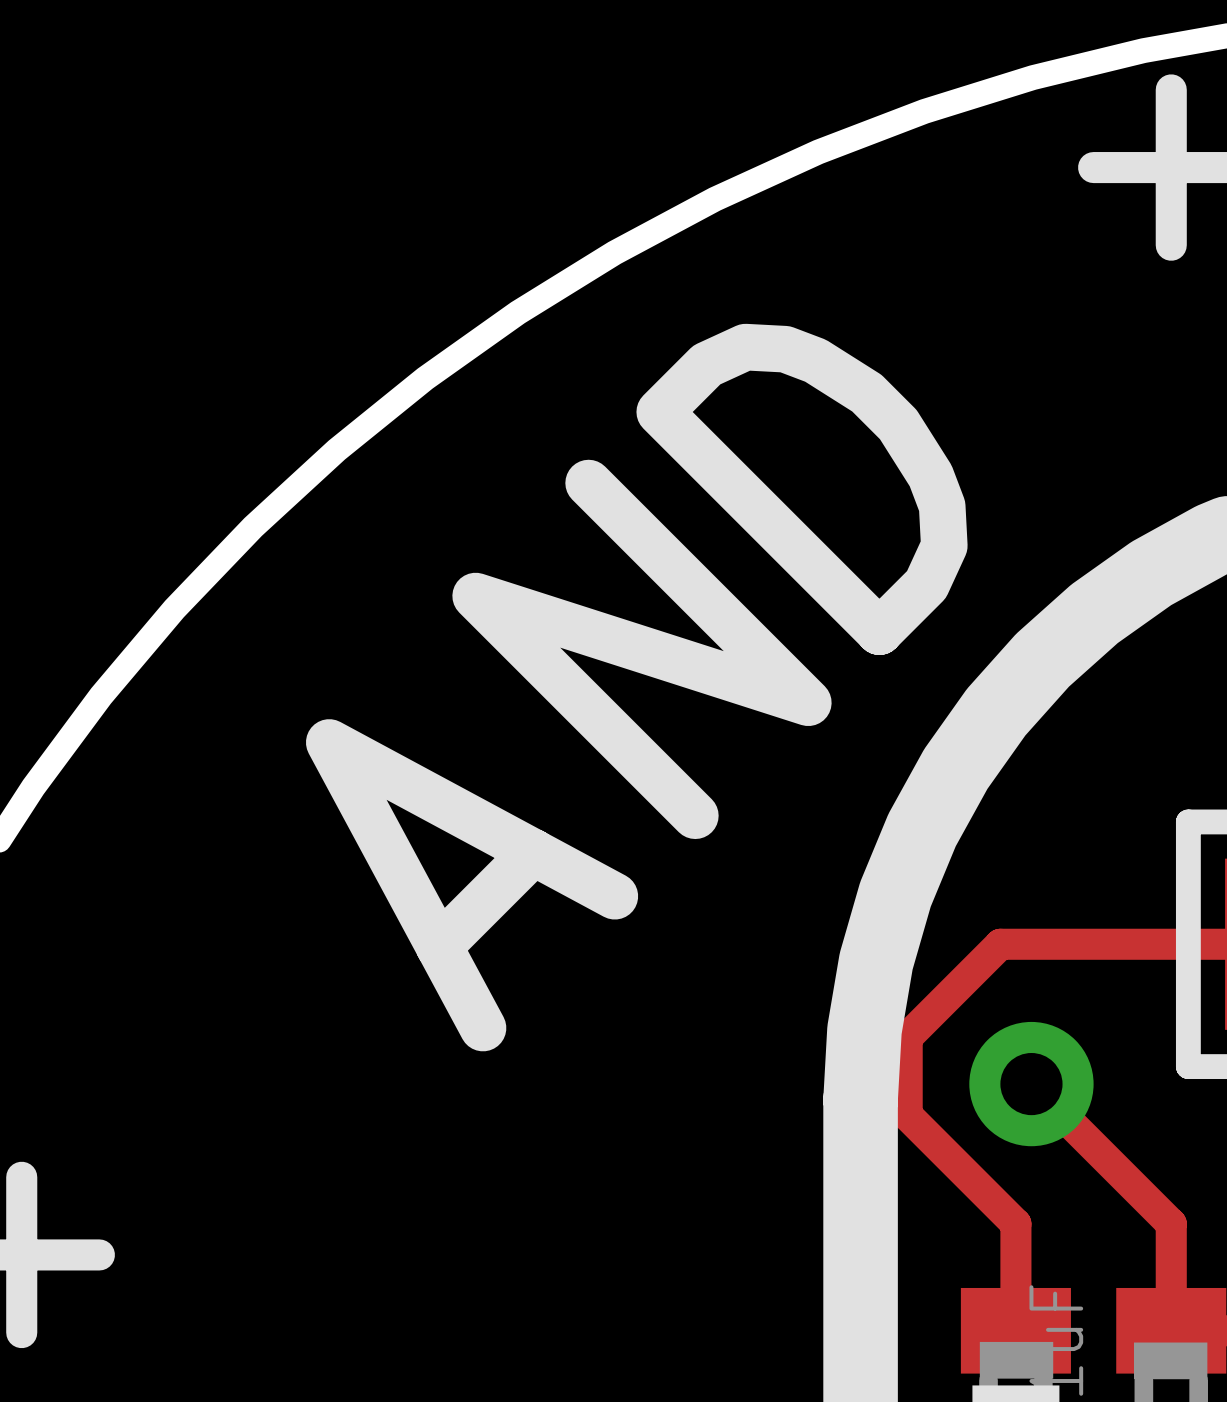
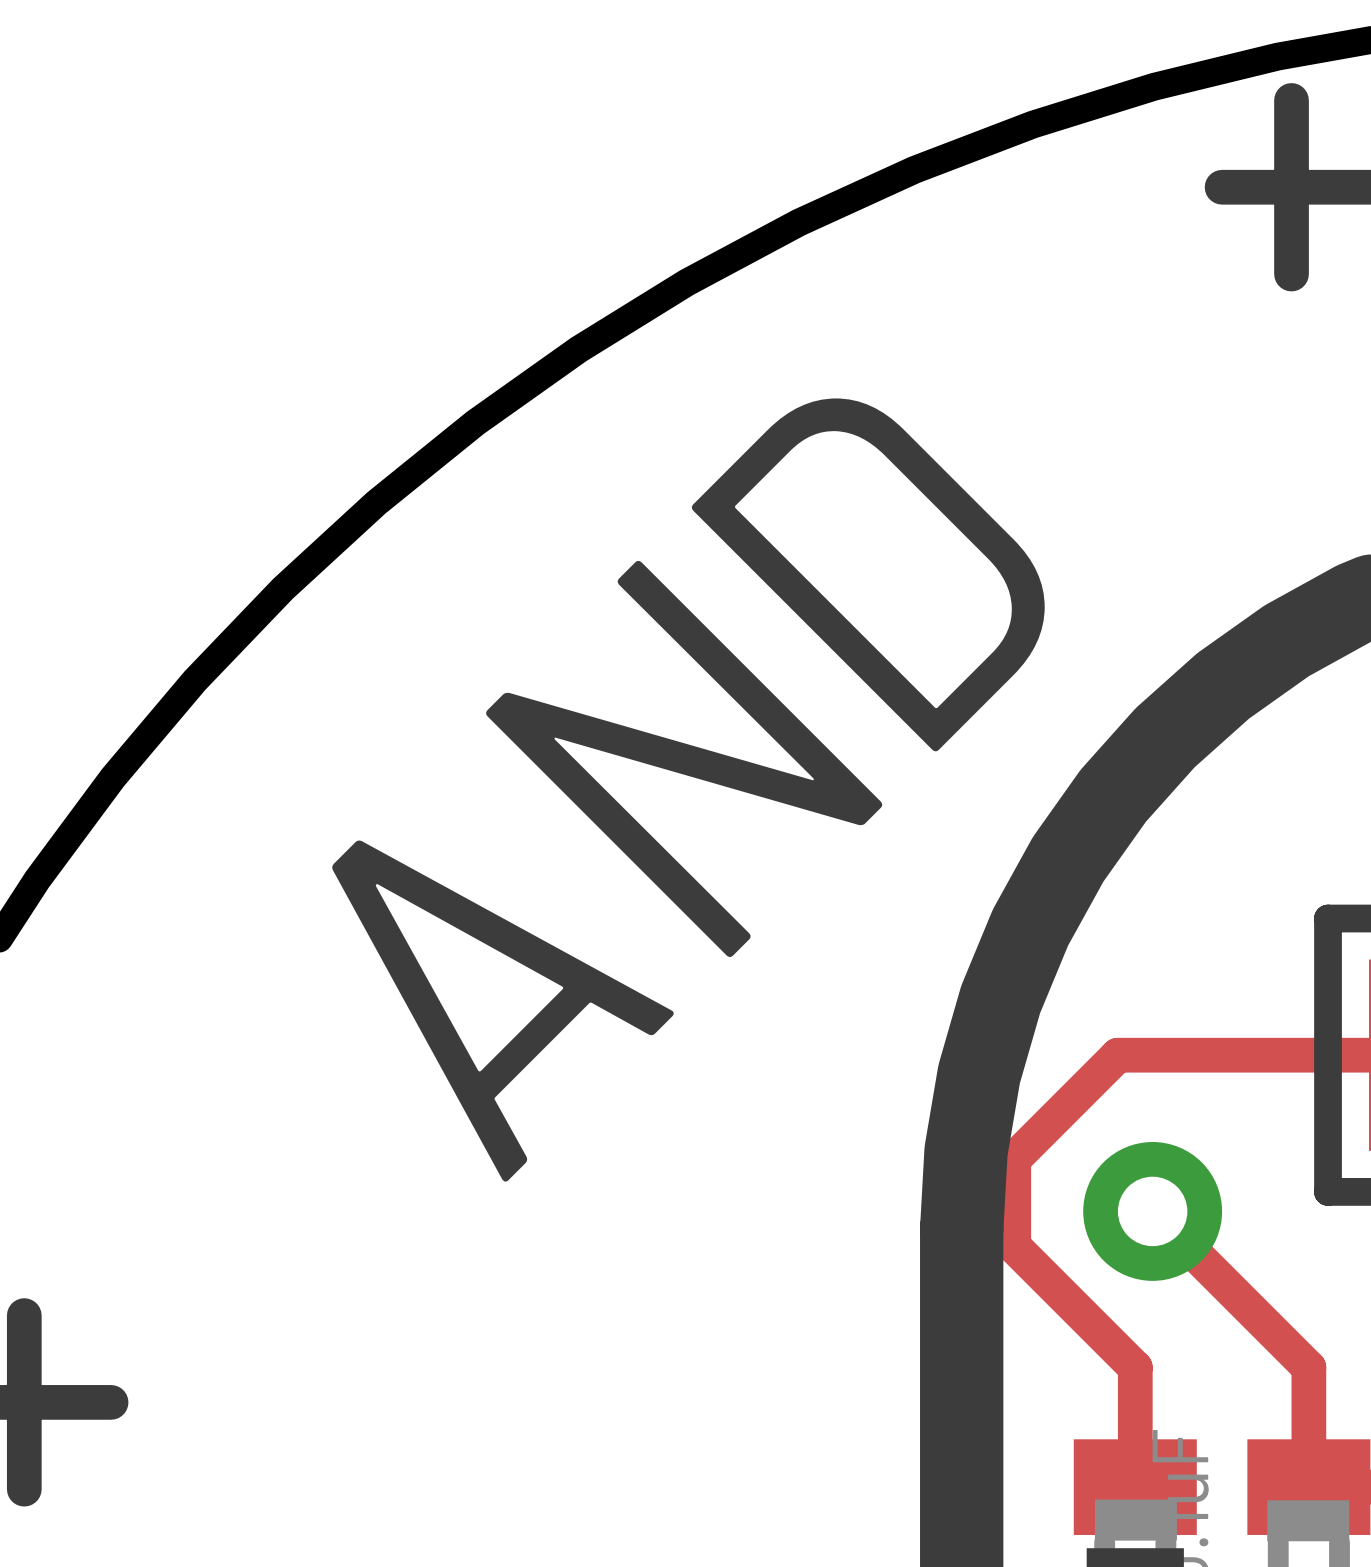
line: (1171, 89) (1171, 245) -> (1291, 100) (1291, 274)

